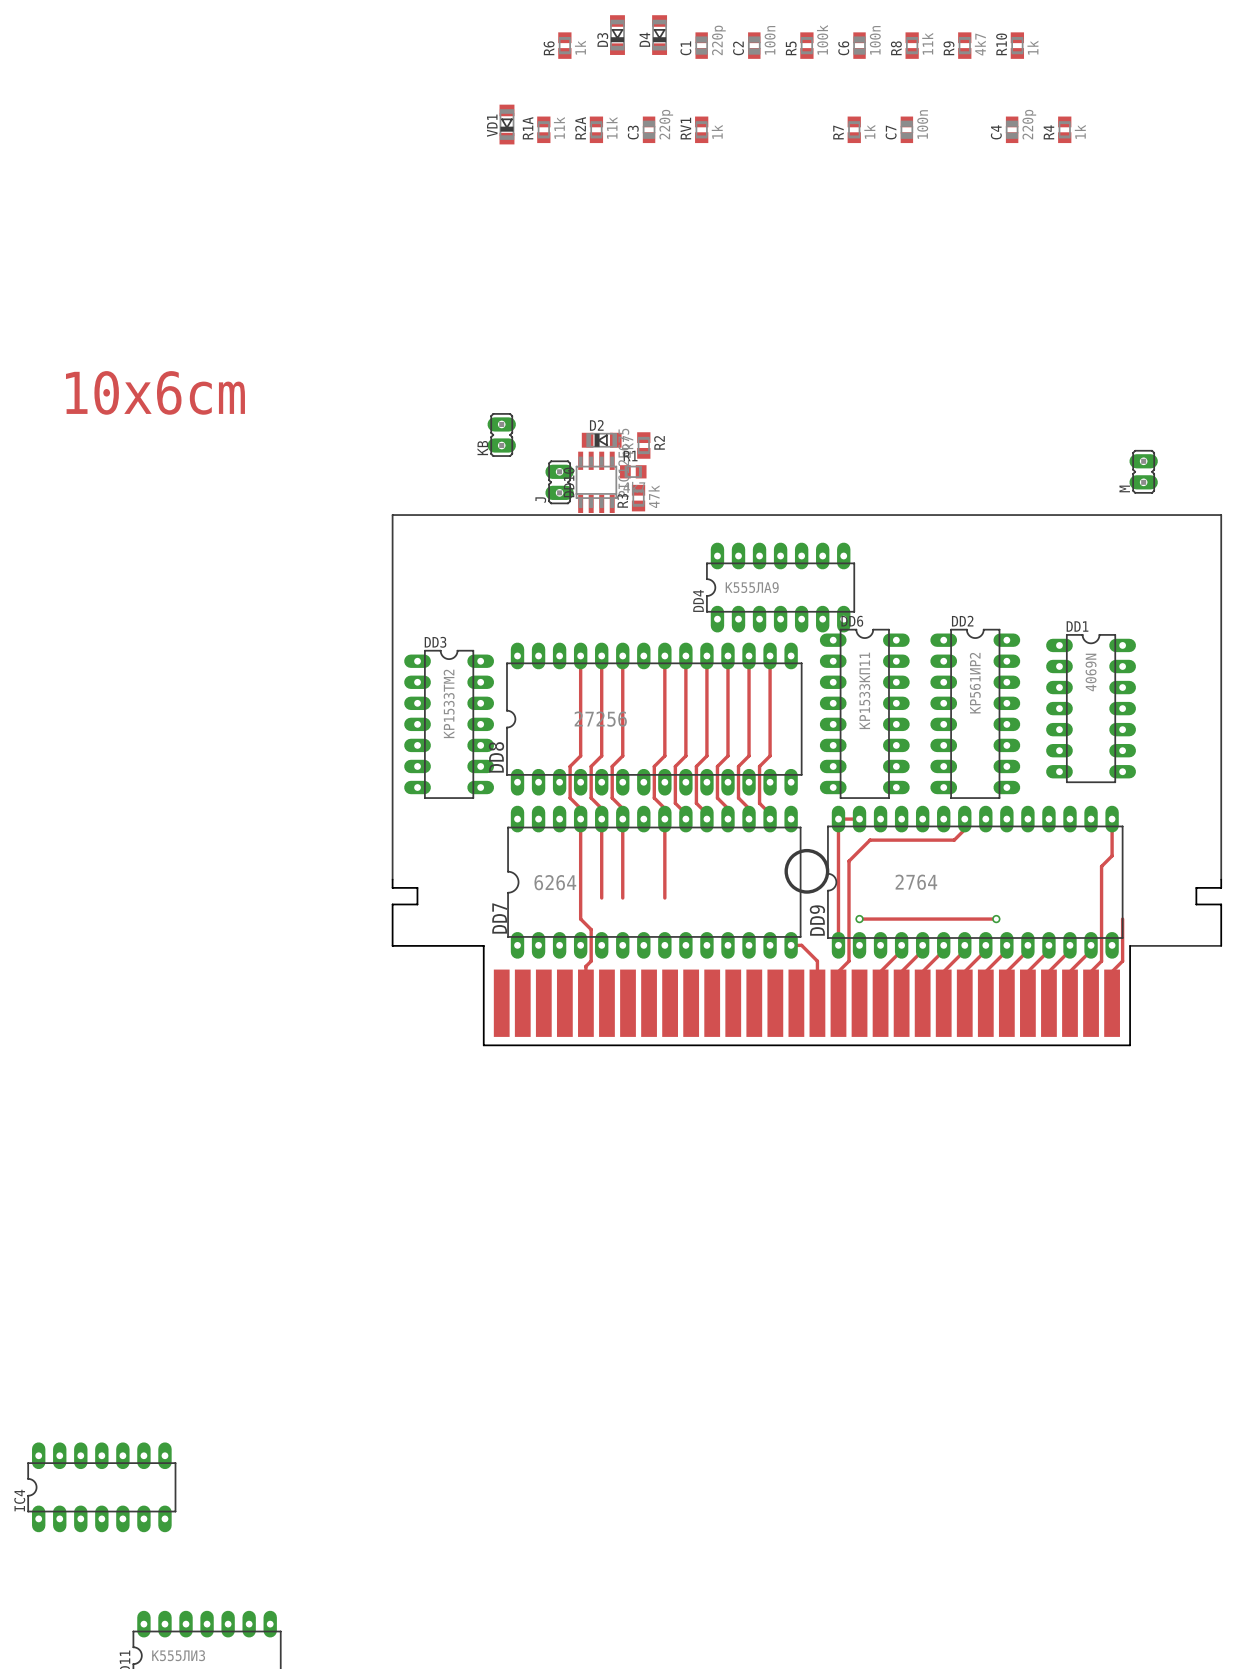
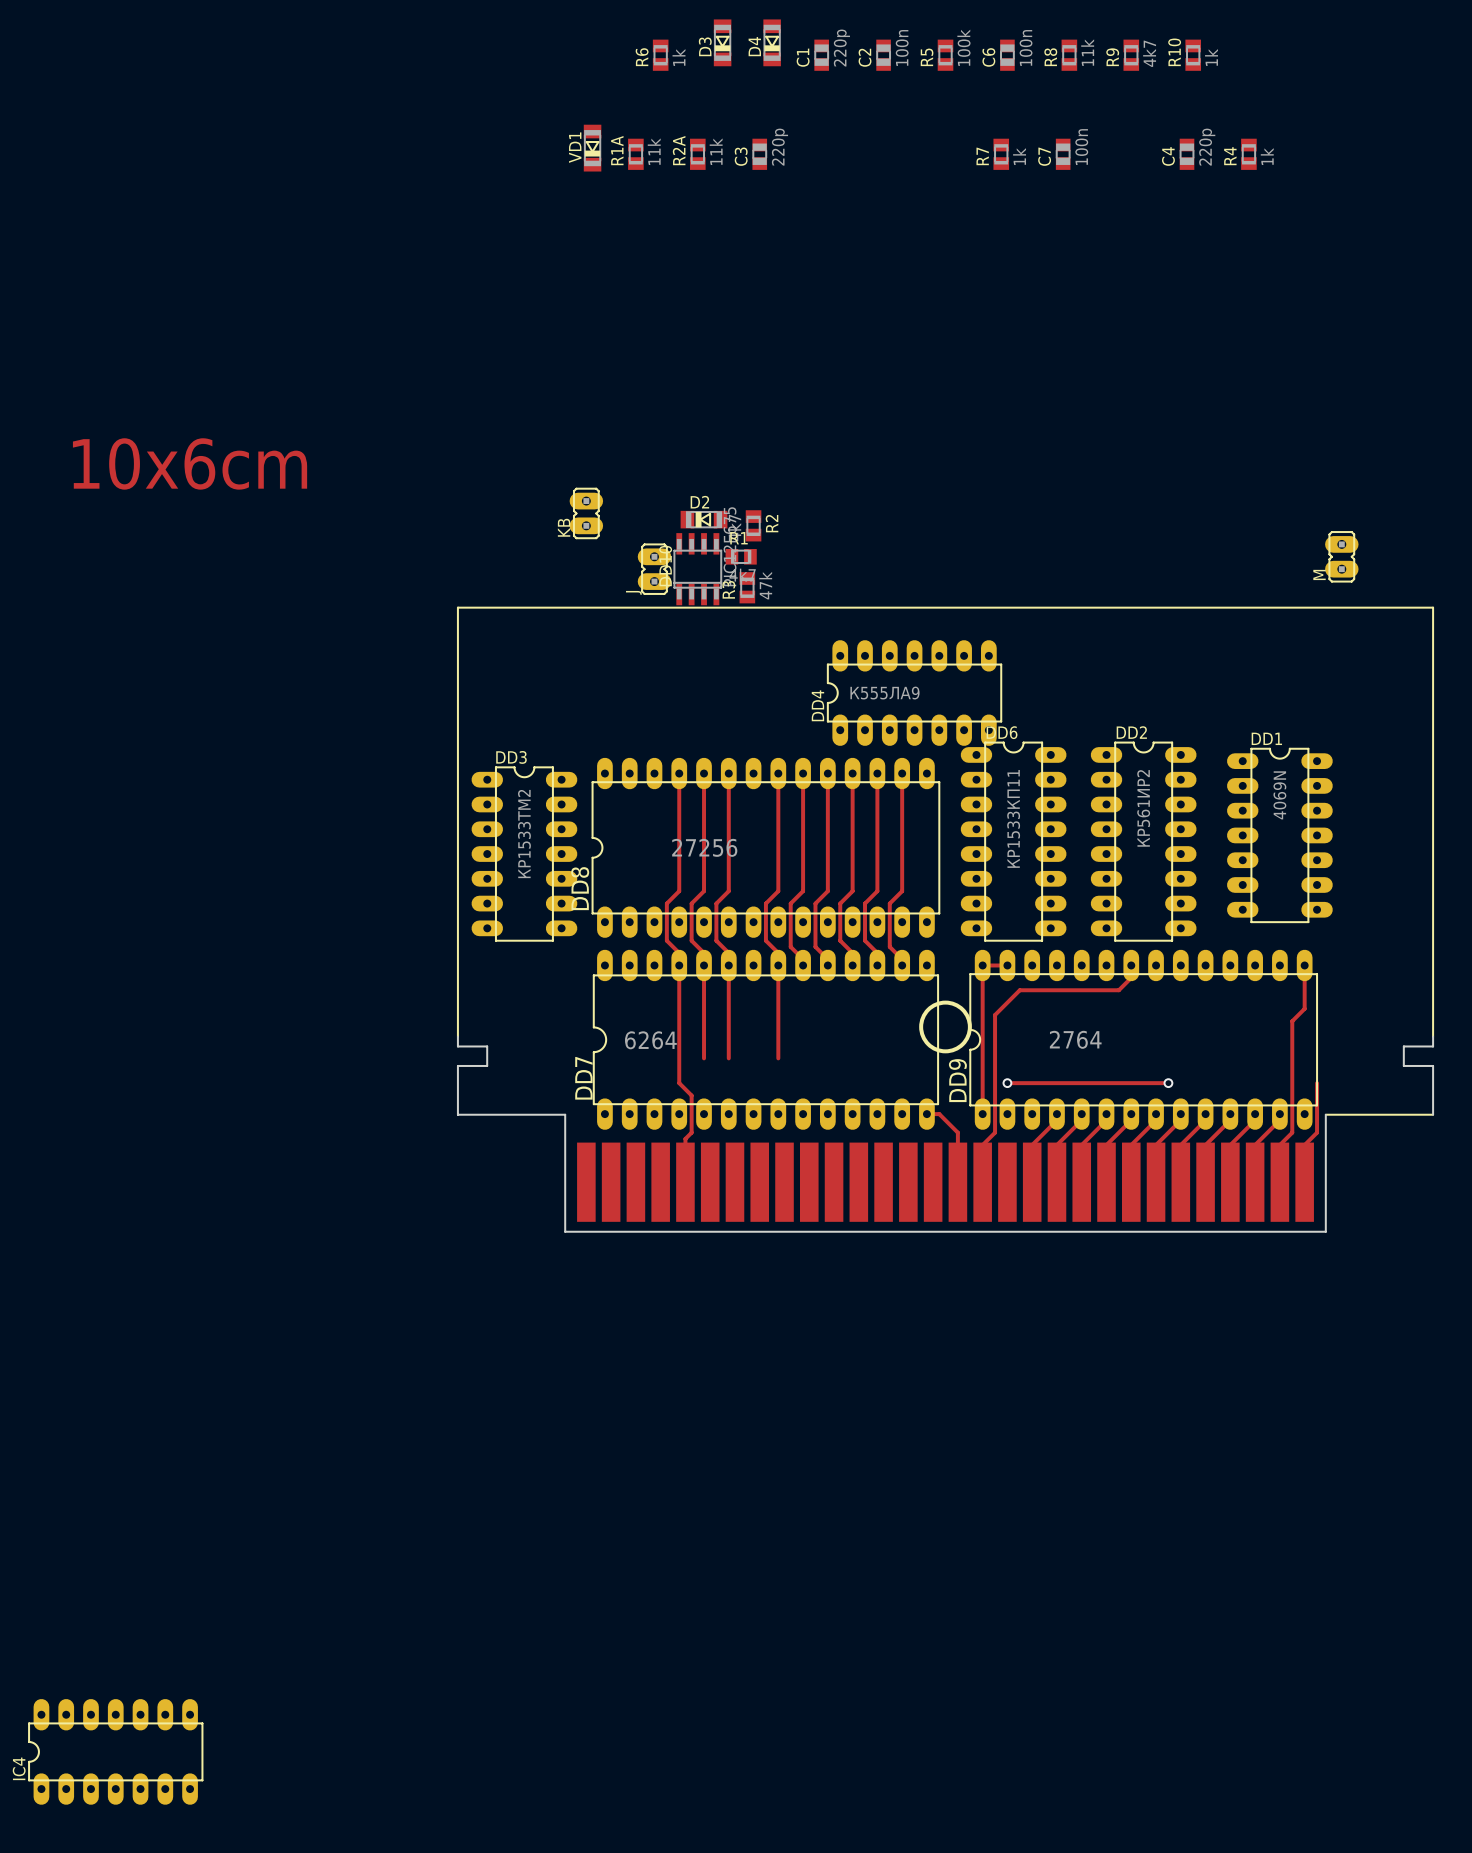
RV1: 1k (701, 129) -> none

